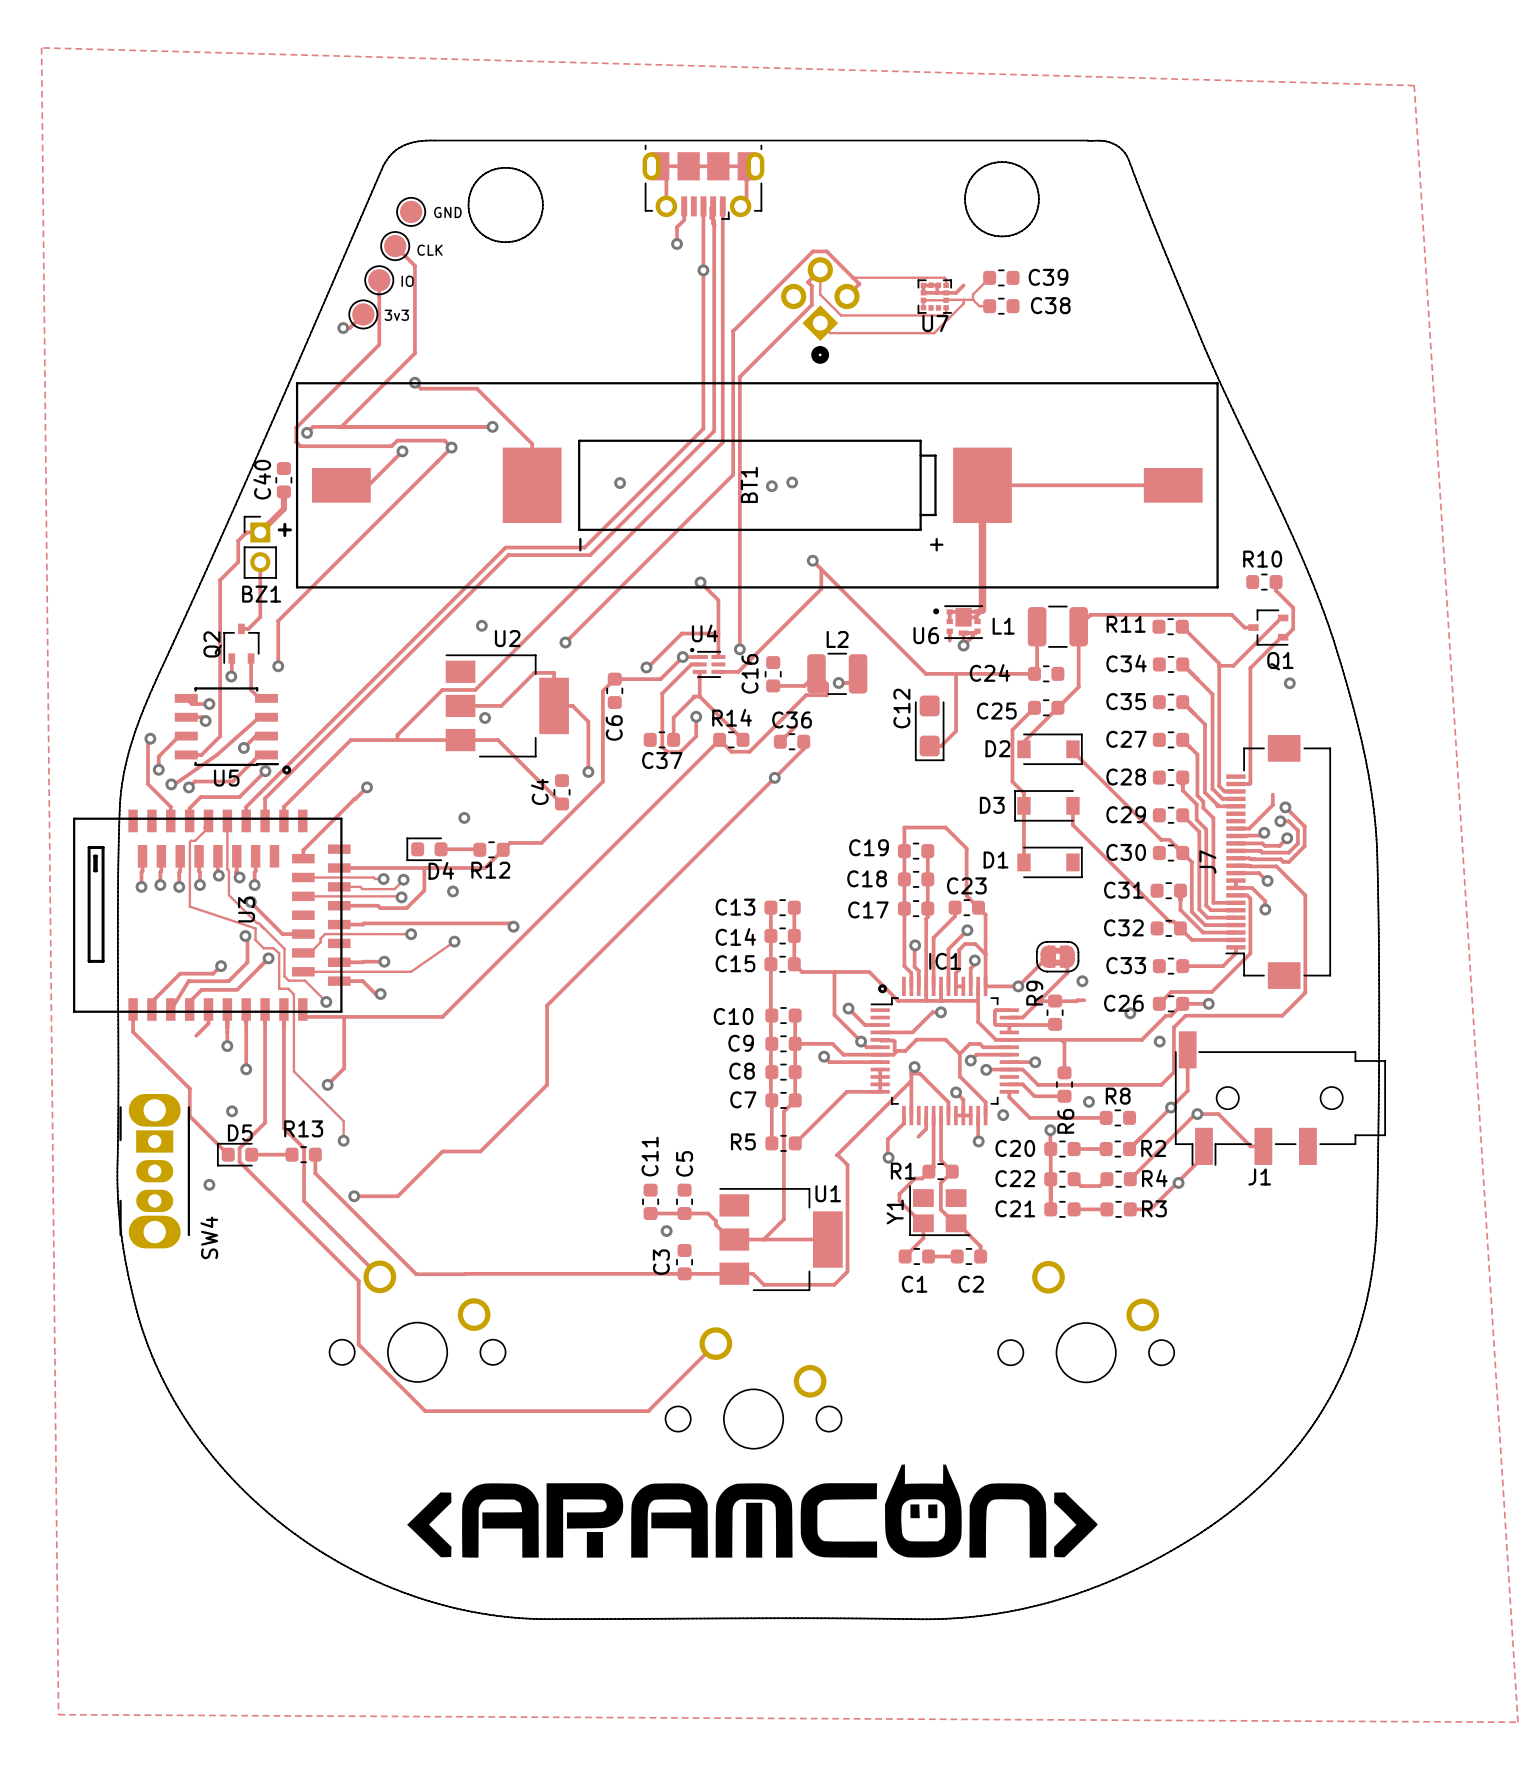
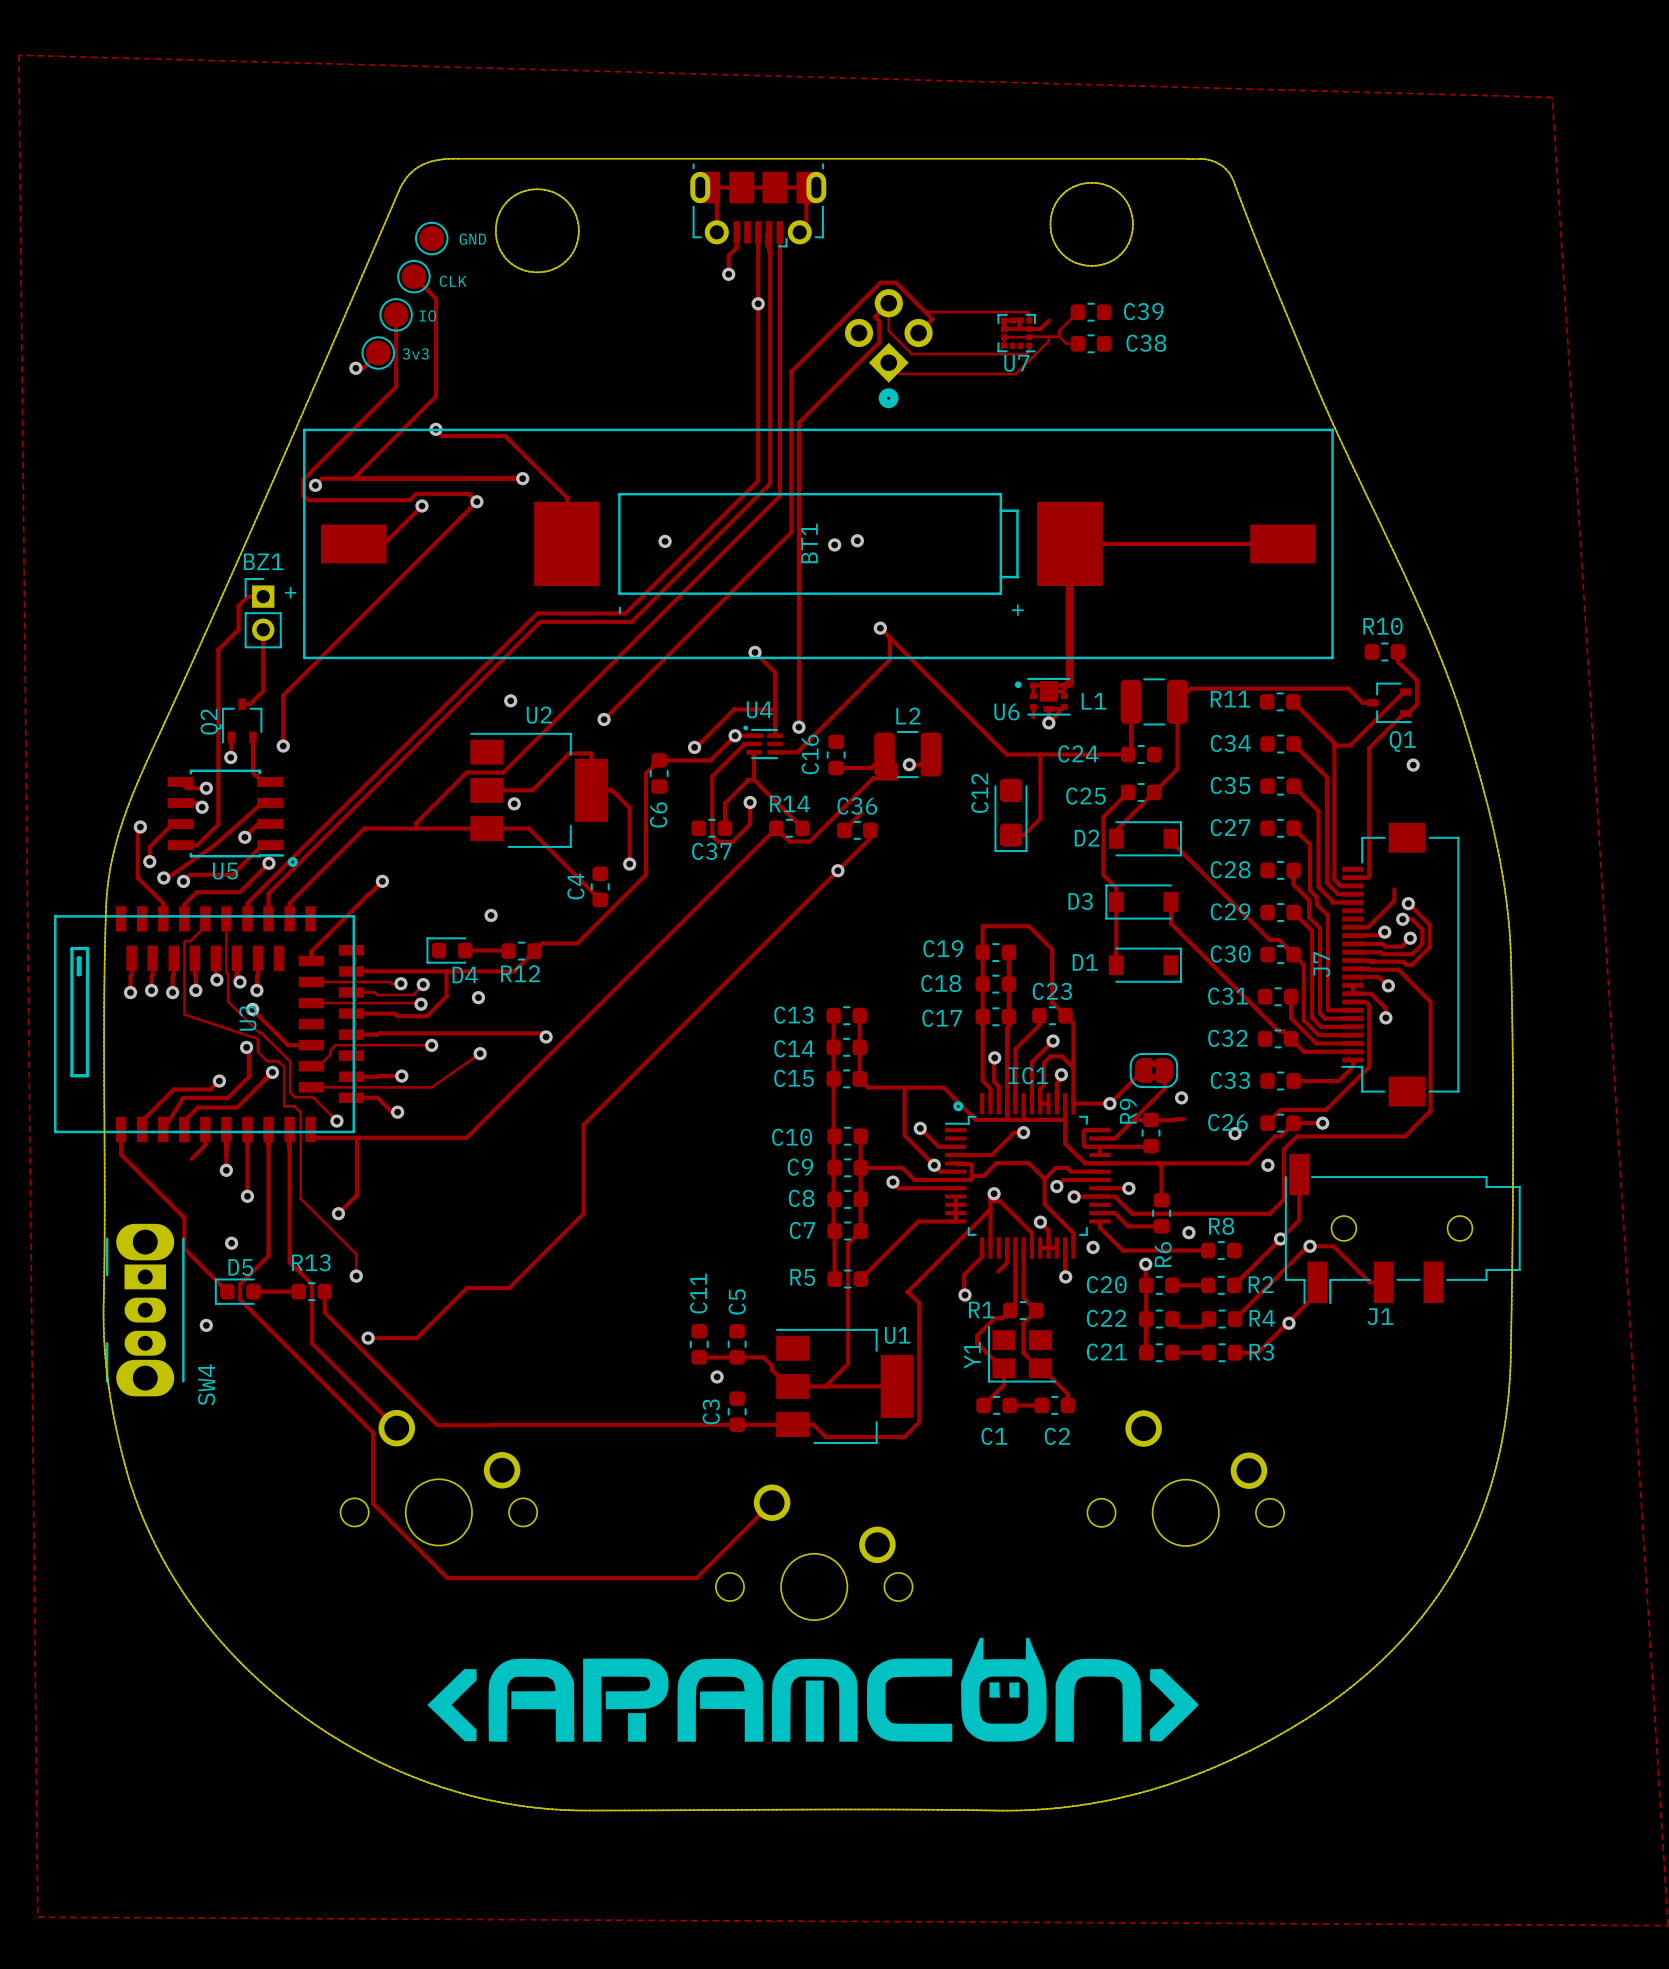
C40: (283, 480) -> none
track: (283, 491) (283, 508) (260, 532) -> none
BZ1 name position: BZ1 (261, 594) -> BZ1 (263, 561)

